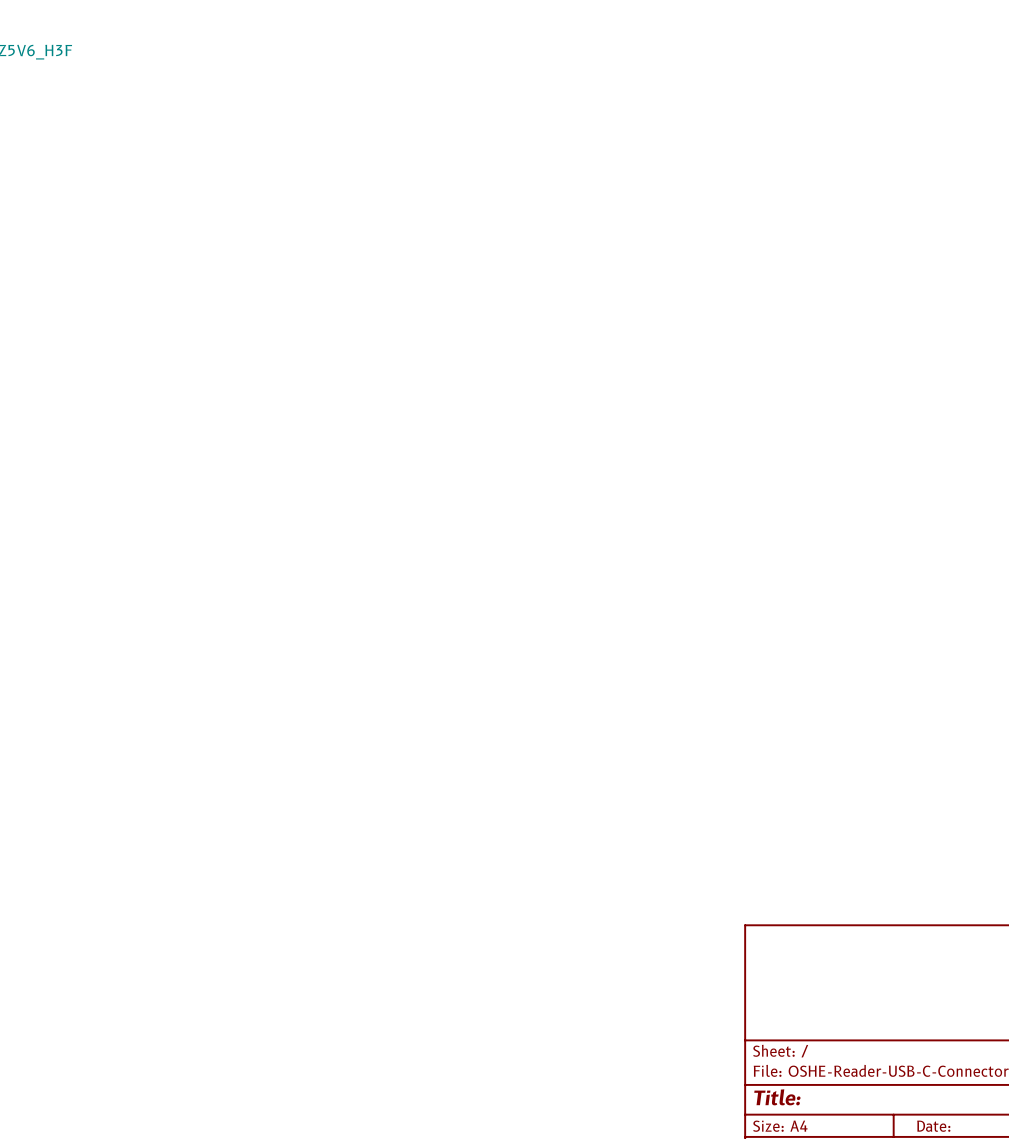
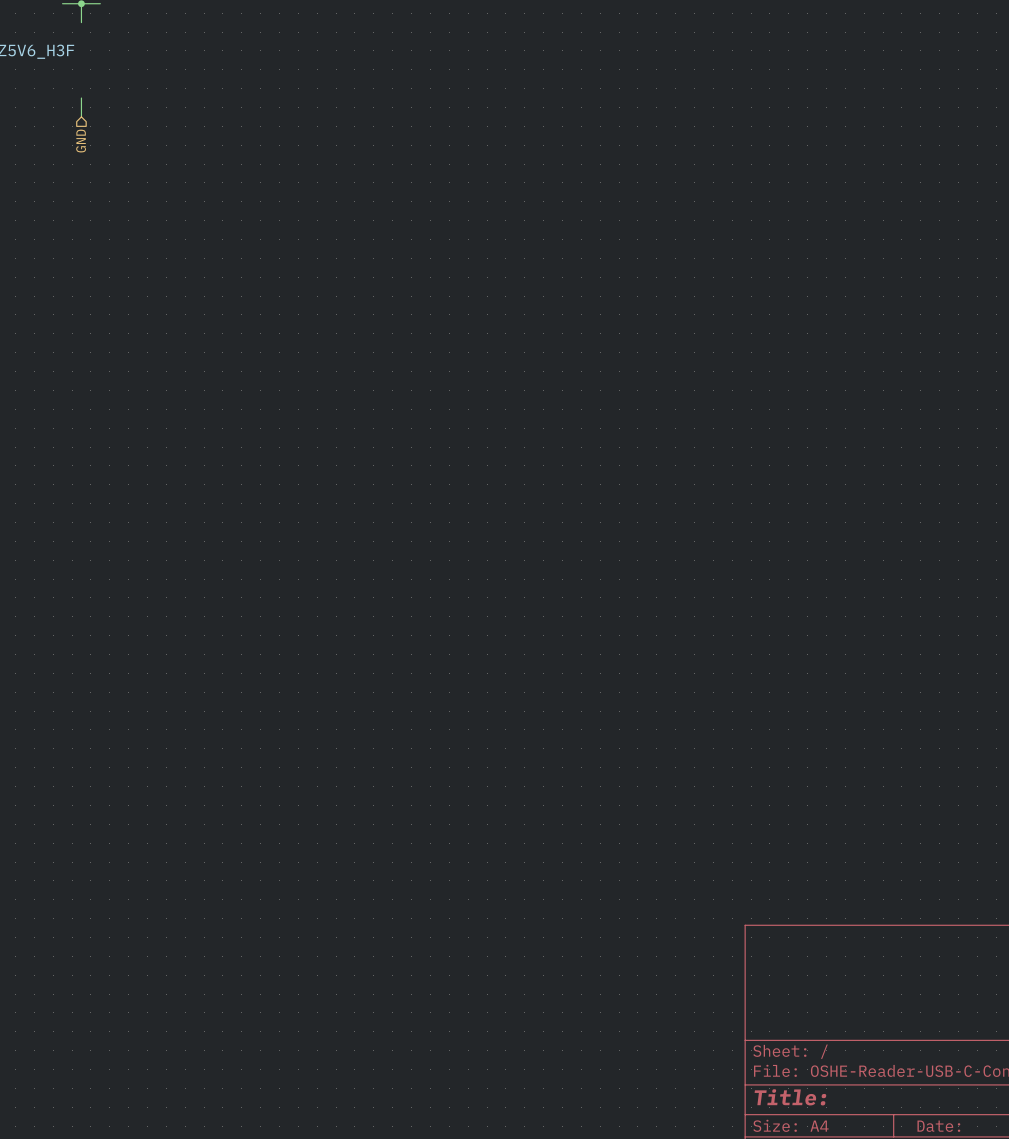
wire: none -> (62, 3) (100, 3)
wire: none -> (81, 3) (81, 22)
junction: none -> (81, 3)
wire: none -> (81, 98) (81, 116)
hierarchical label: none -> GND (81, 141)

